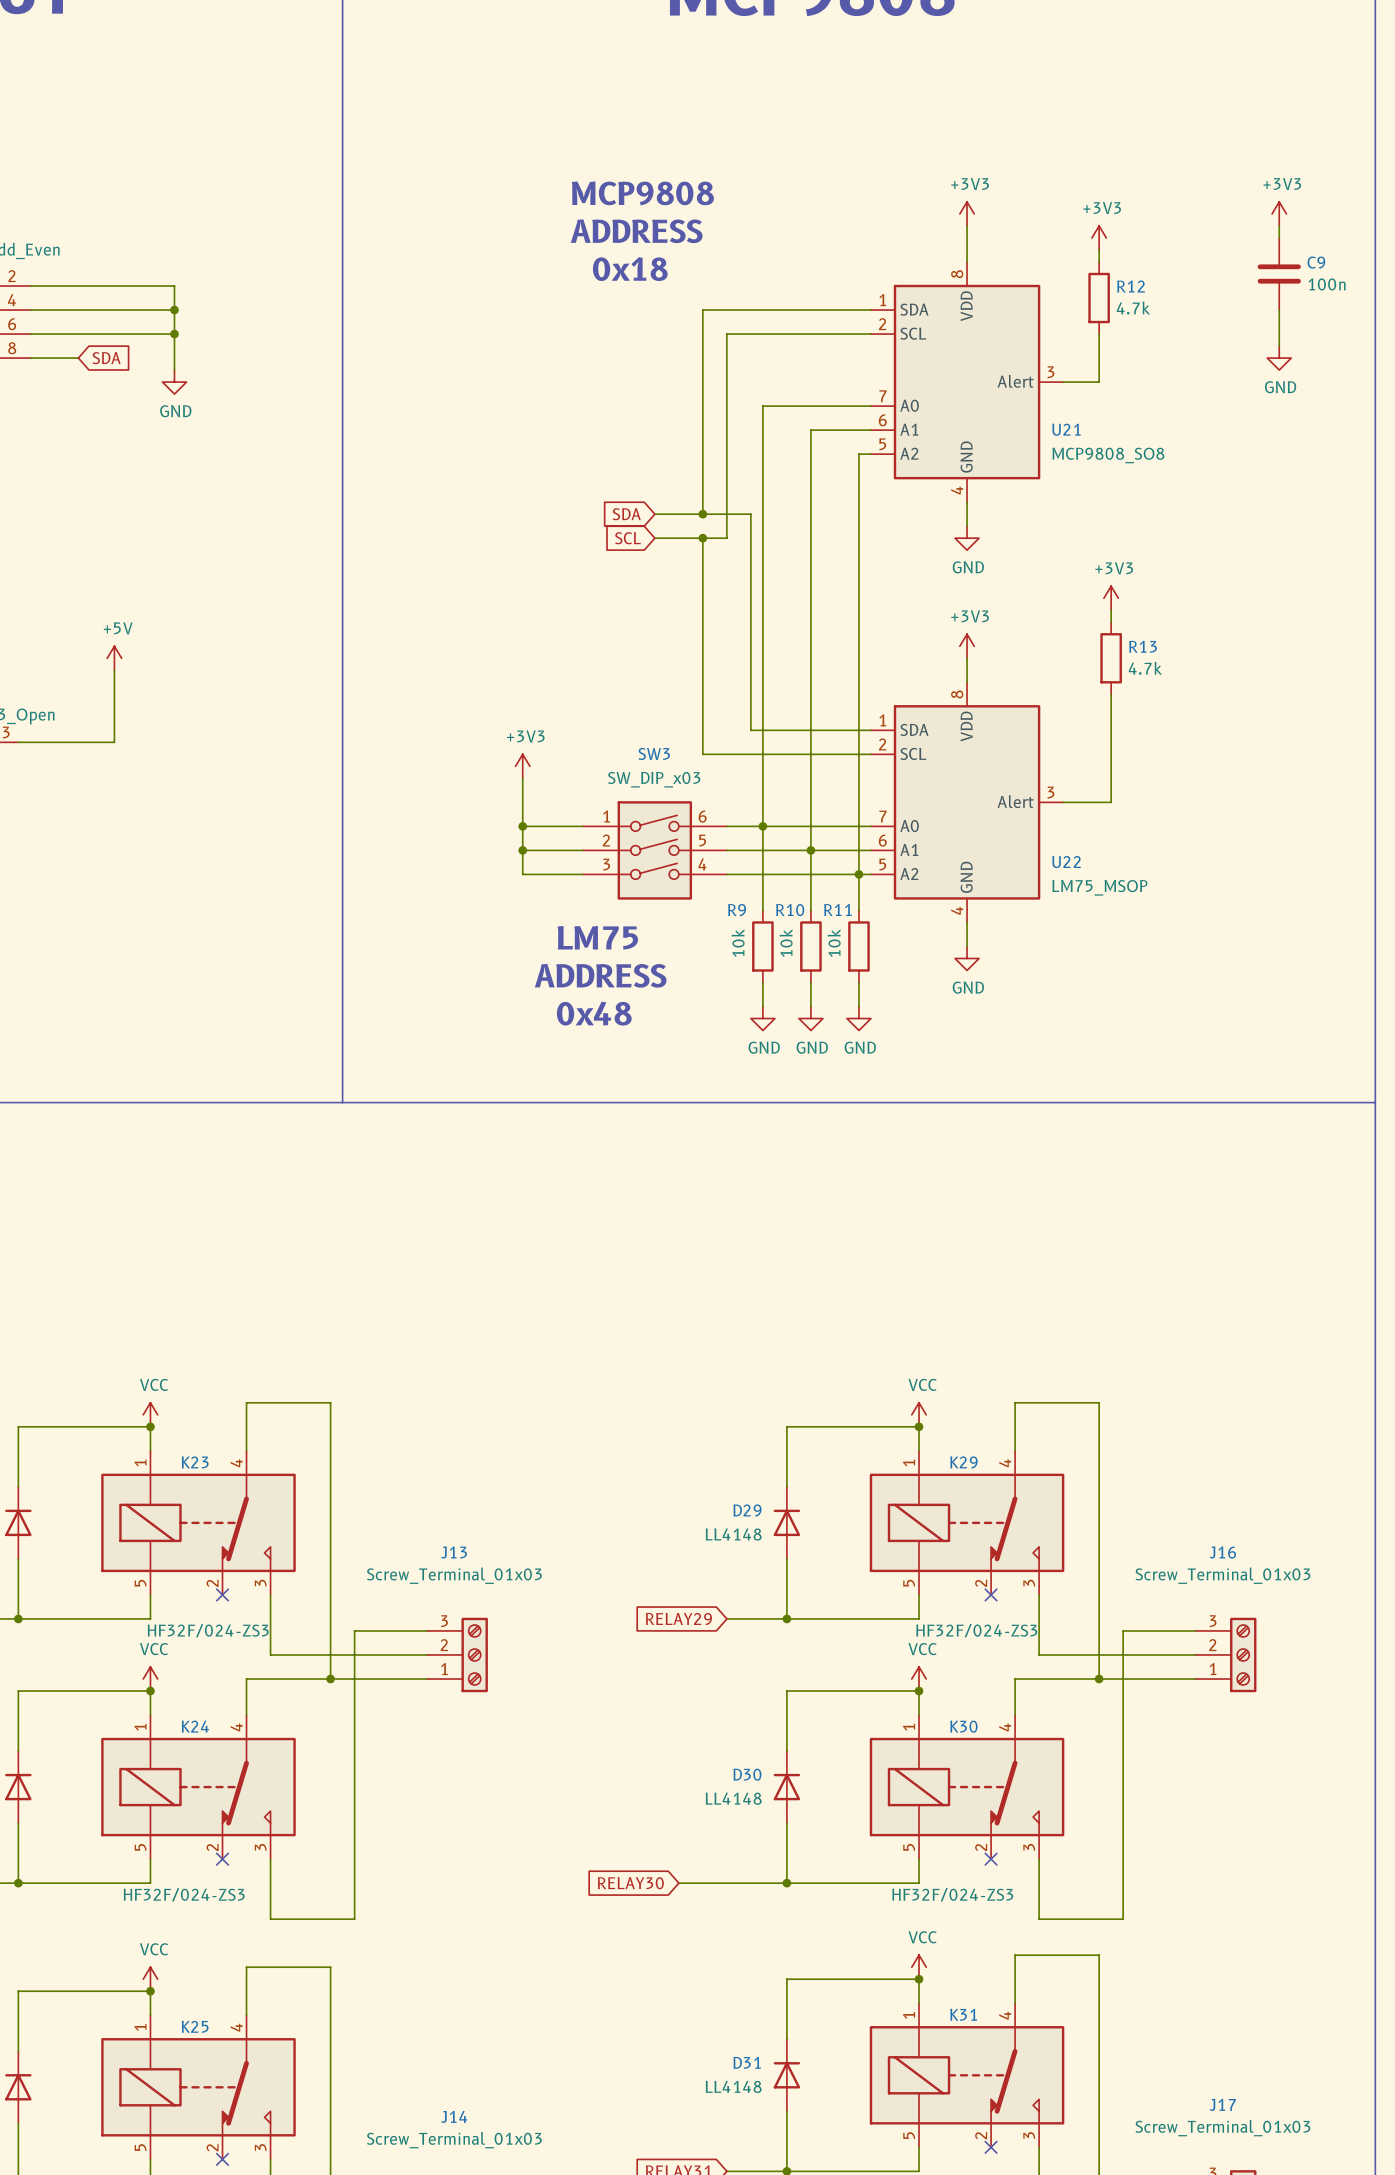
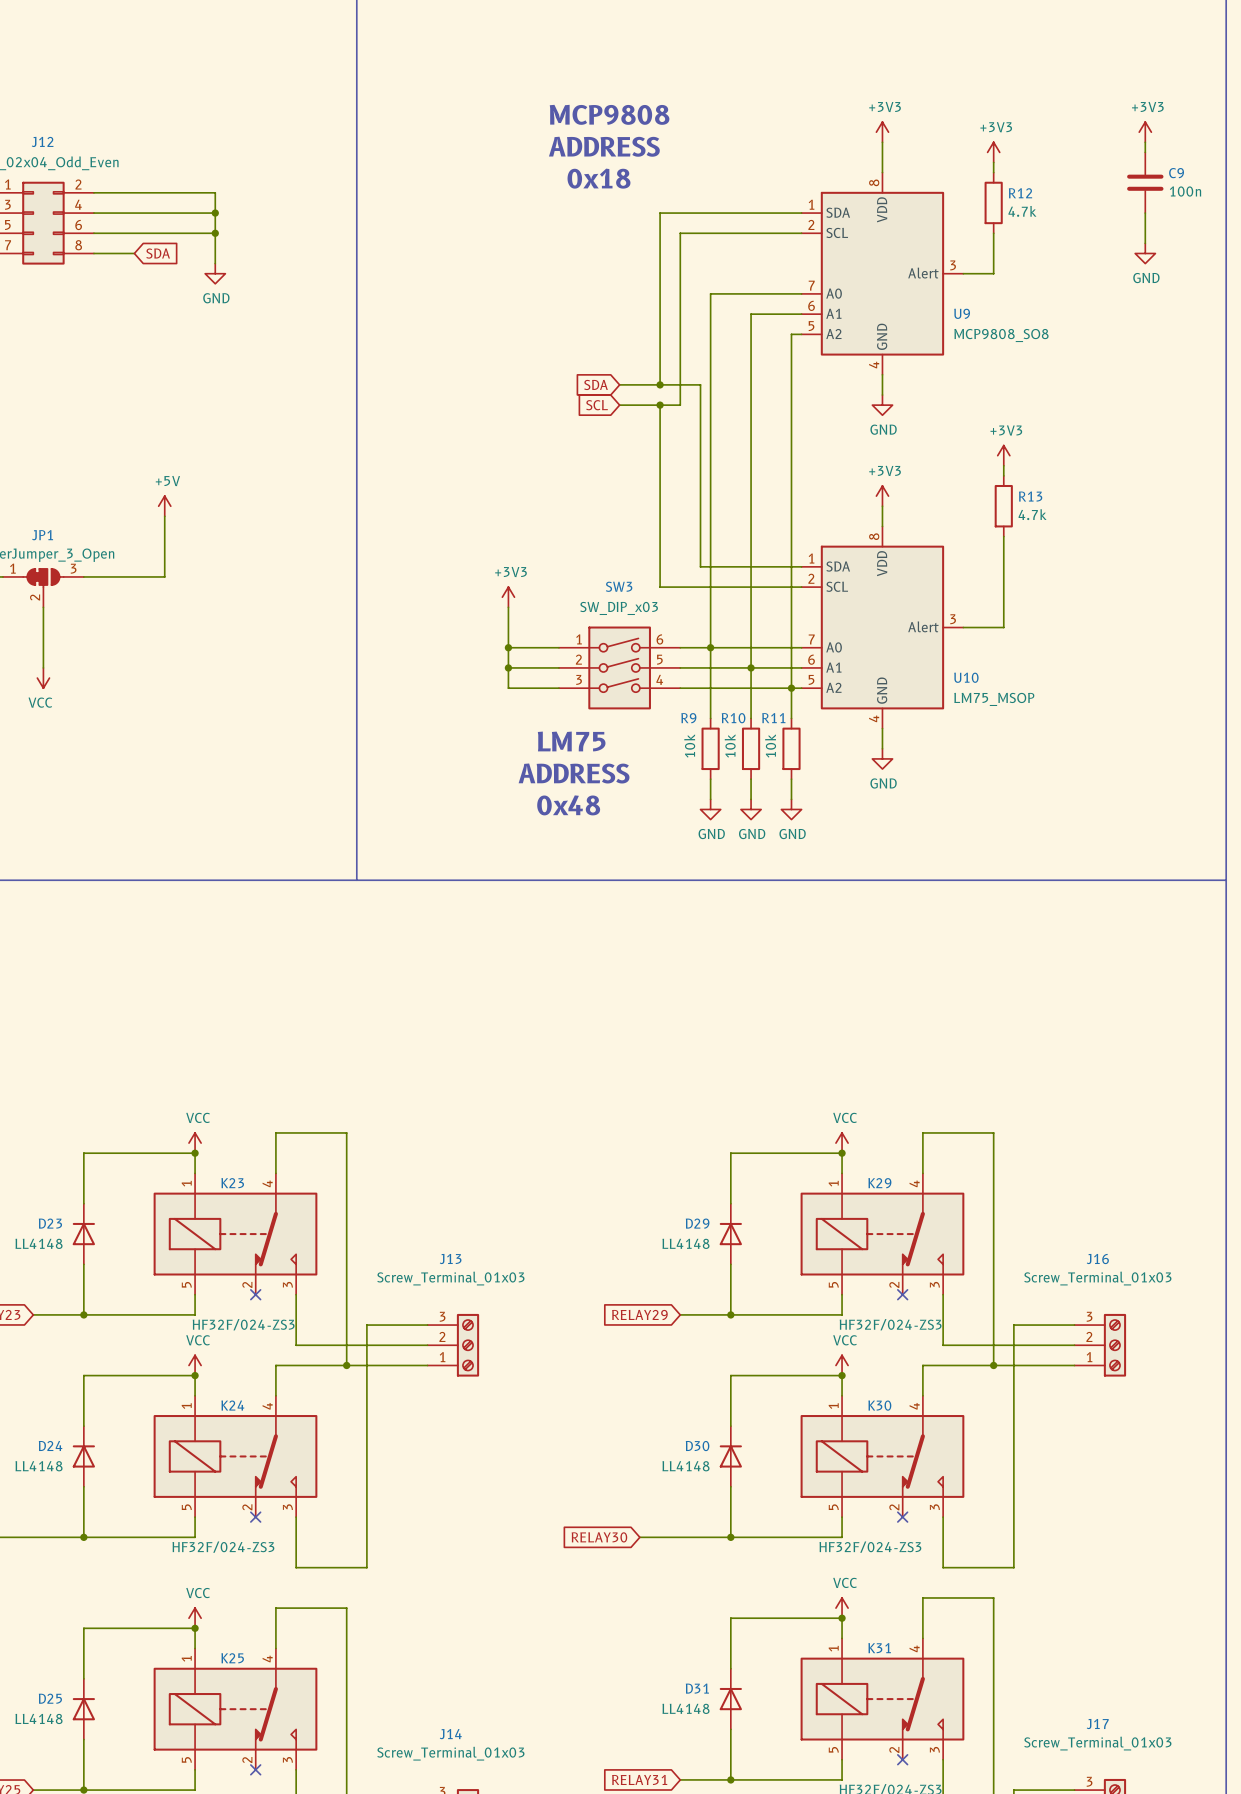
U21 name: U21 (1066, 429) -> U9 (962, 313)
U22 name: U22 (1066, 862) -> U10 (966, 677)

